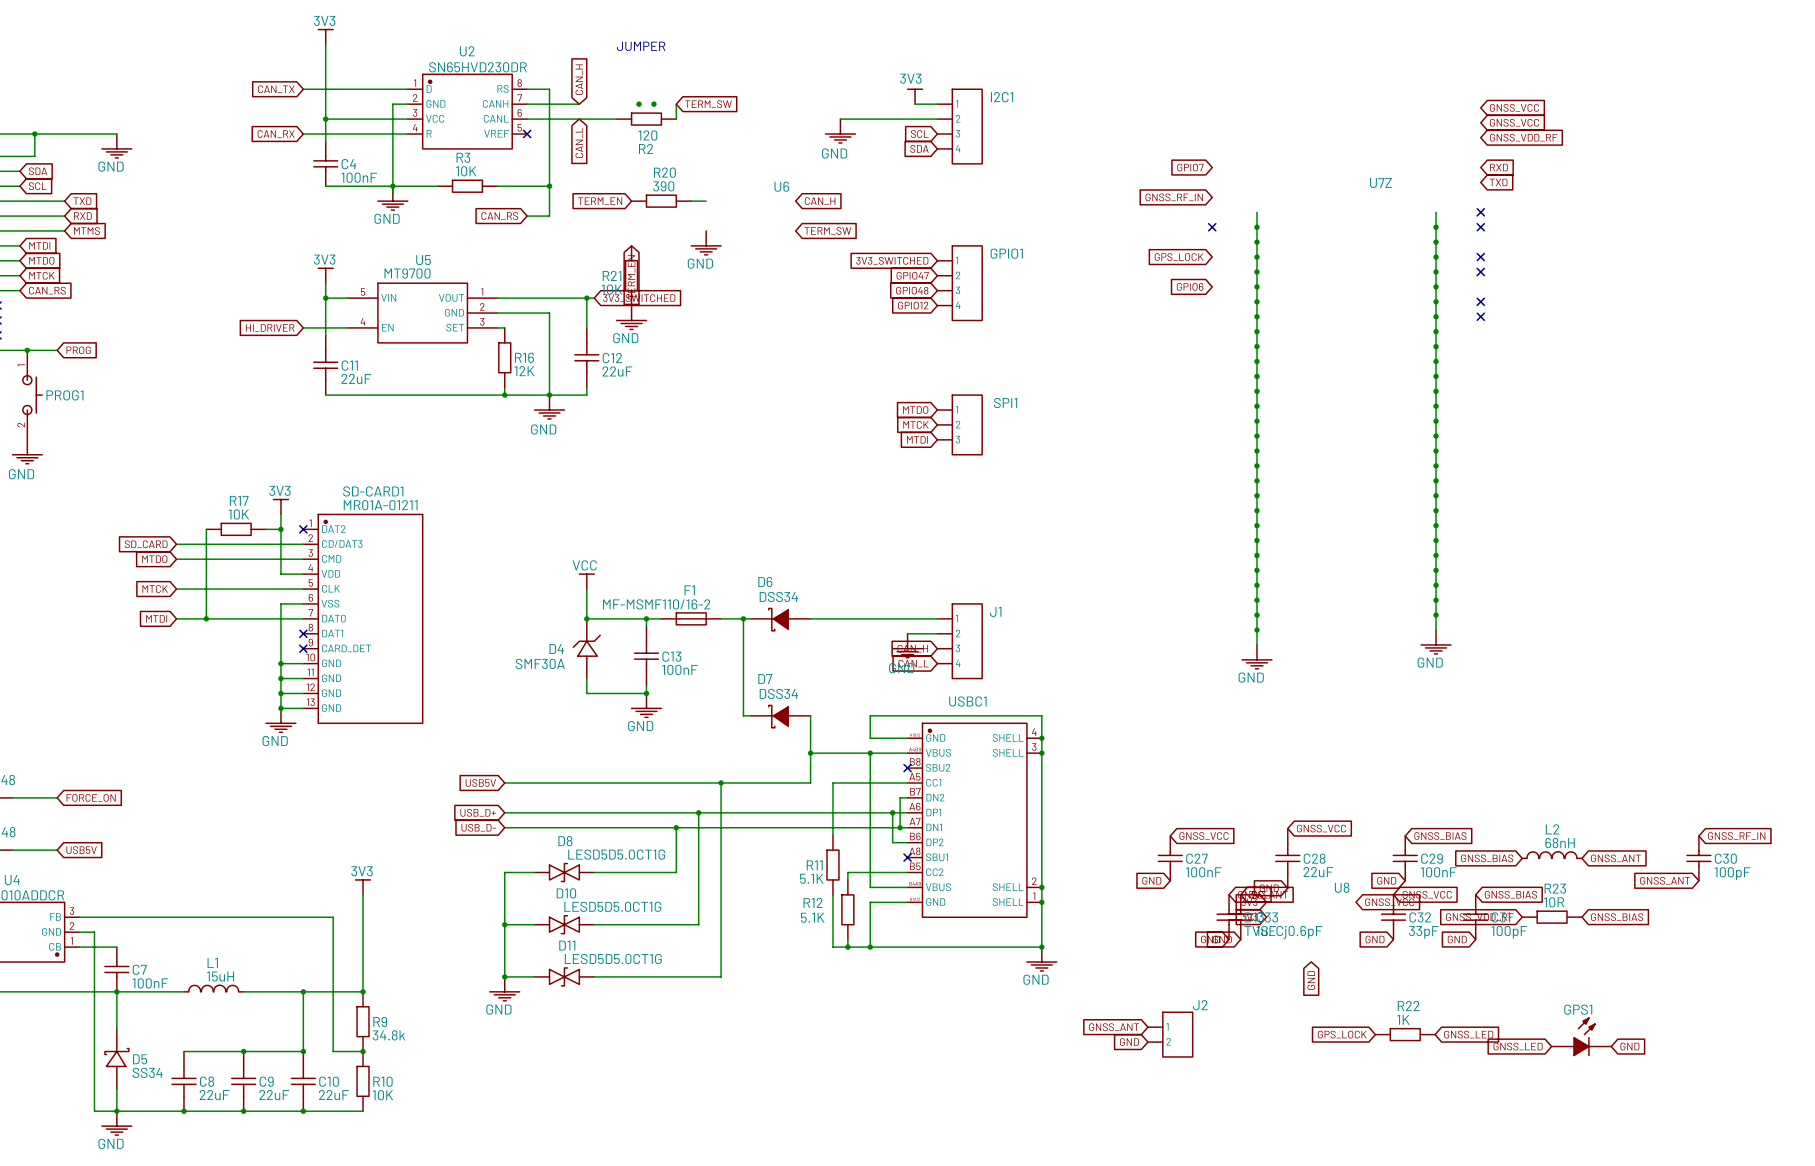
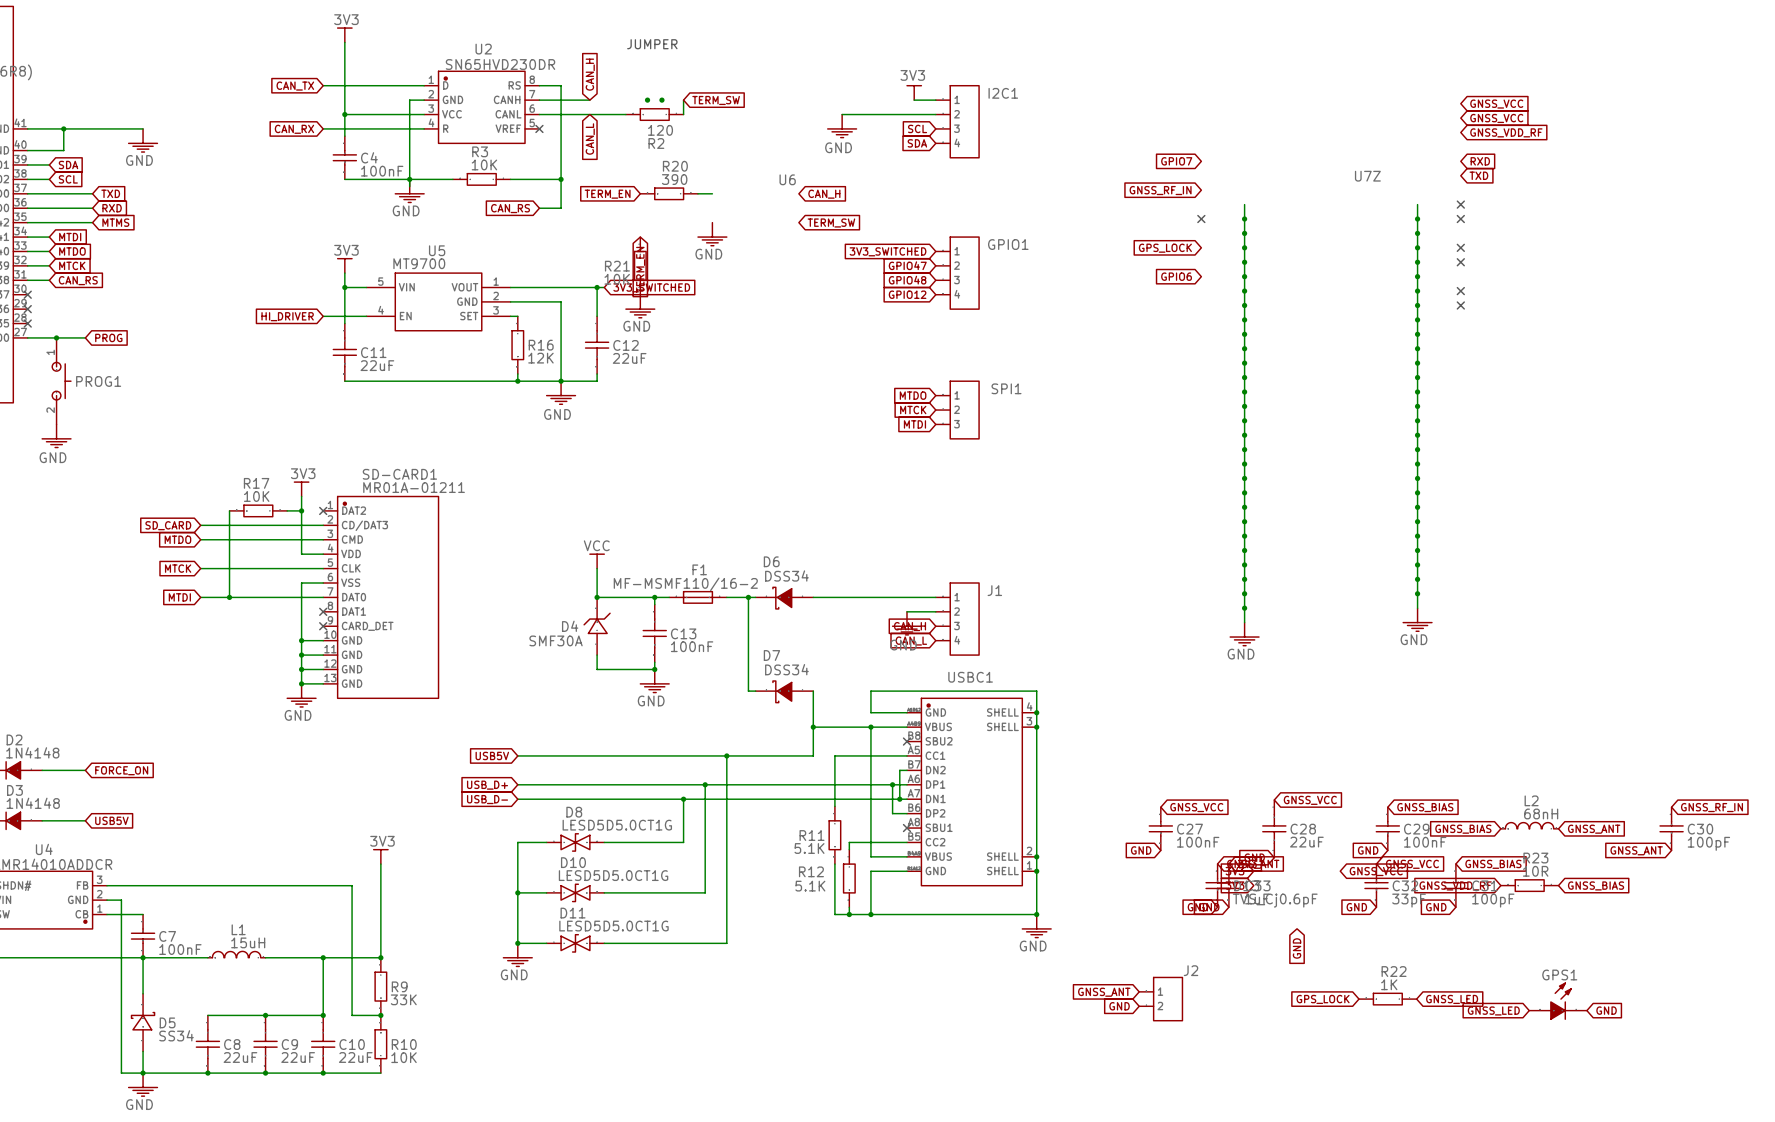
U8: (1342, 887) -> none
R9 value: 34.8k (388, 1035) -> 33K (403, 999)

